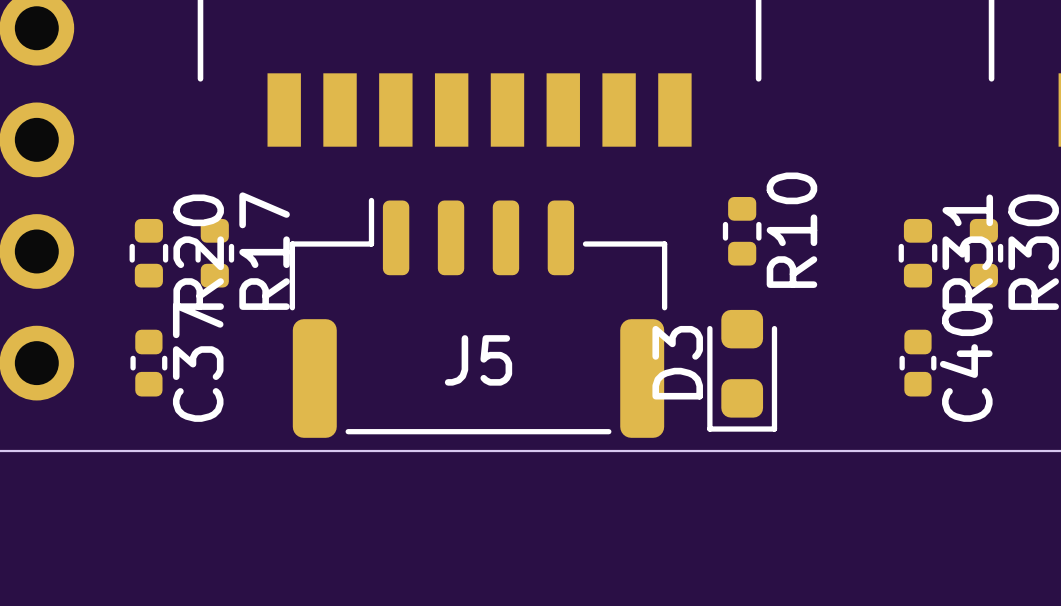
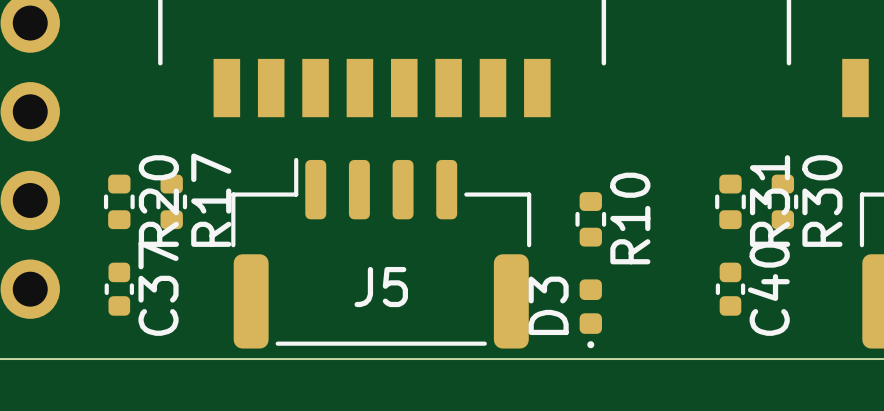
R10 position: (742, 231) -> (590, 219)
D3 footprint: [707, 309, 778, 432] -> [579, 279, 602, 349]

